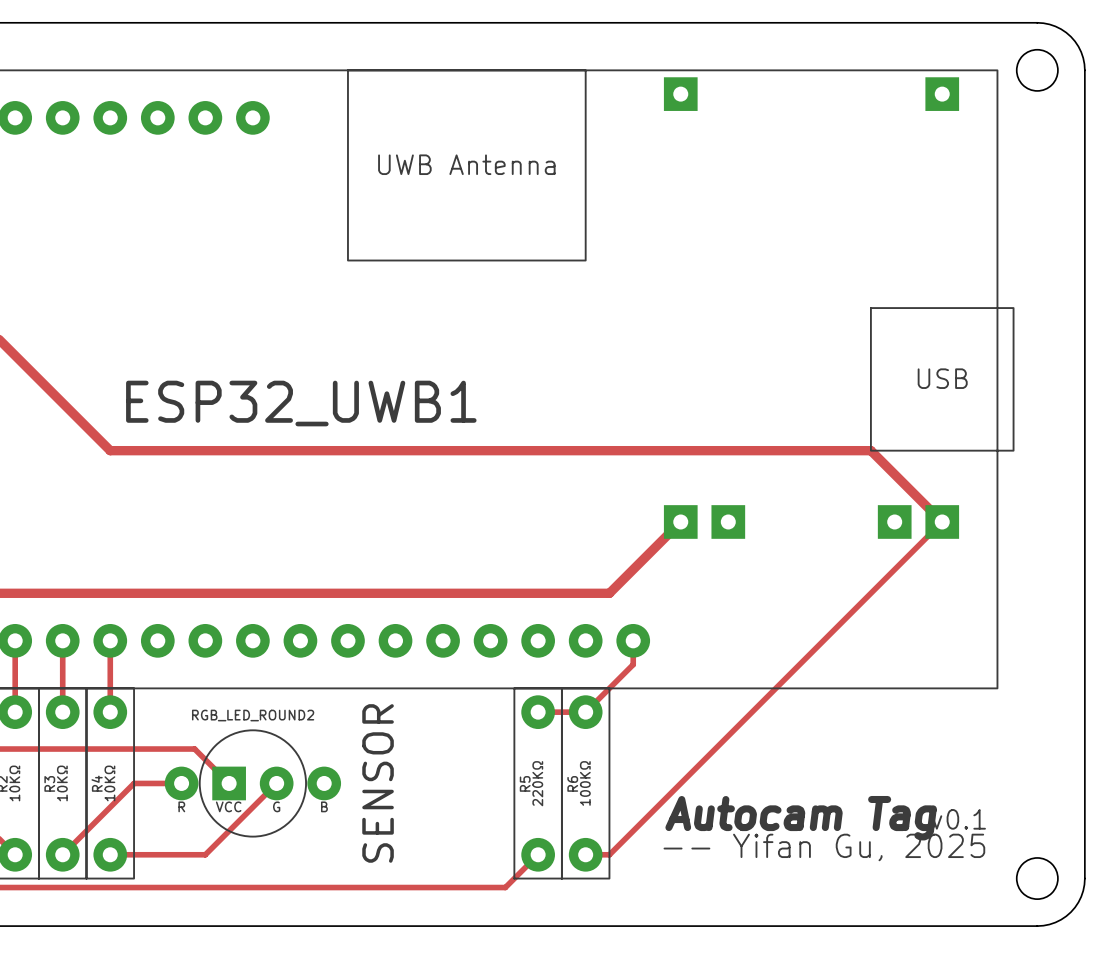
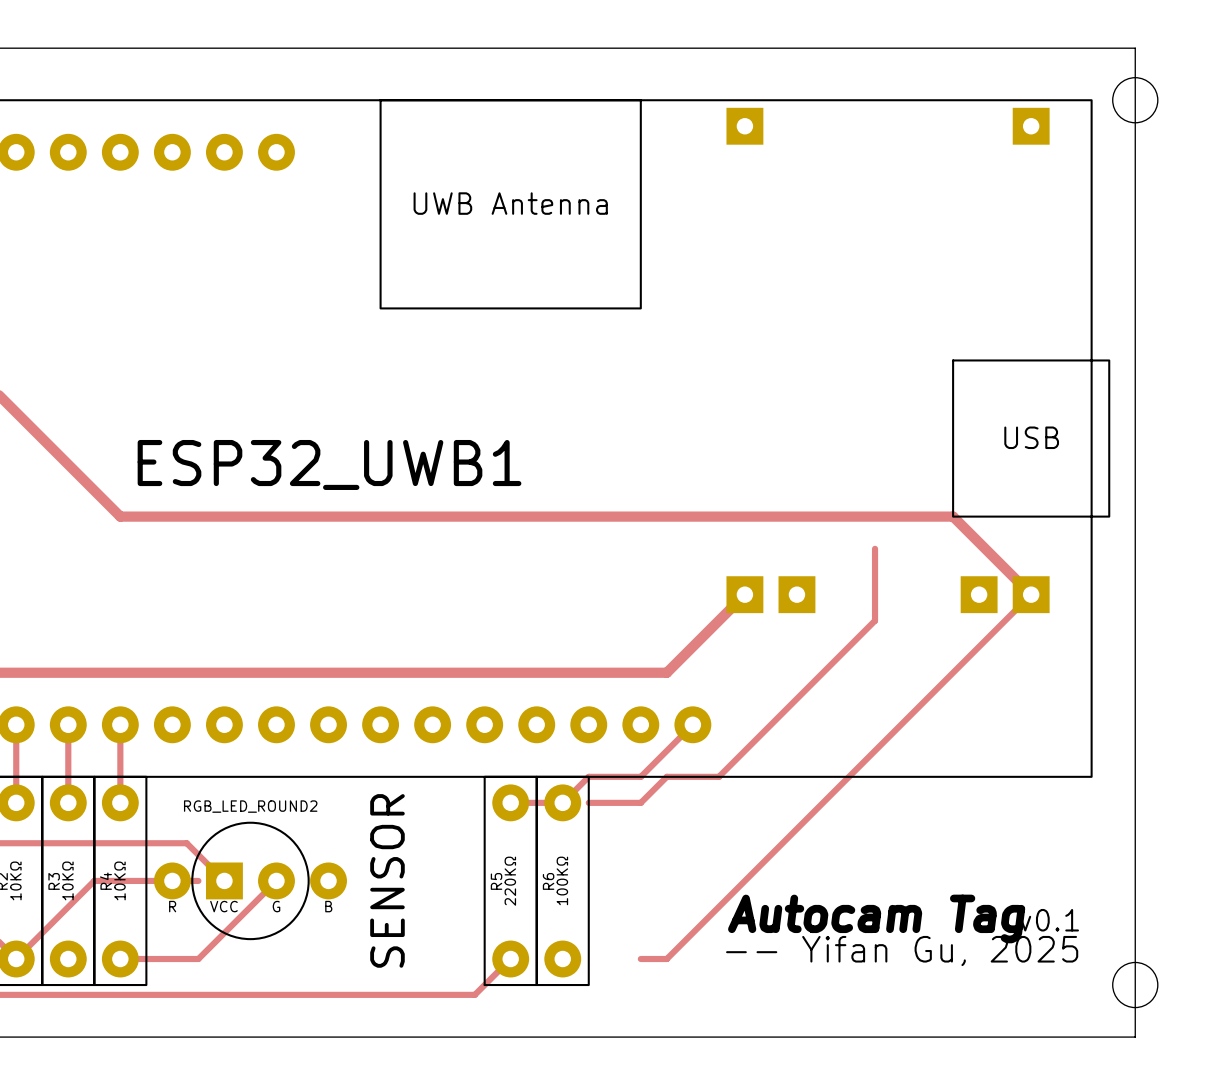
board edge: (1037, 22) (1055, 26) (1070, 36) (1081, 52) (1084, 70) (1084, 878) (1081, 896) (1070, 912) (1055, 922) (1037, 926) -> (1135, 48) (1135, 1037)
top track: none -> (875, 548) (875, 620) (718, 776) (666, 776)
top track: (633, 640) (633, 664) (609, 688) -> (692, 724) (640, 776) (588, 776) (562, 802) (510, 802)
top track: (170, 749) (194, 749) (229, 783) -> (186, 843) (224, 880)
top track: (134, 783) (62, 854) -> (146, 880) (94, 880) (16, 959)
RGB_LED_ROUND2 position: (252, 783) -> (250, 880)
top track: (276, 783) (205, 854) (181, 854) -> (276, 880) (198, 959)
R5 position: (538, 783) -> (510, 880)
R6 position: (585, 783) -> (562, 880)
top track: (538, 854) (505, 887) (434, 887) -> (510, 959) (474, 994)

